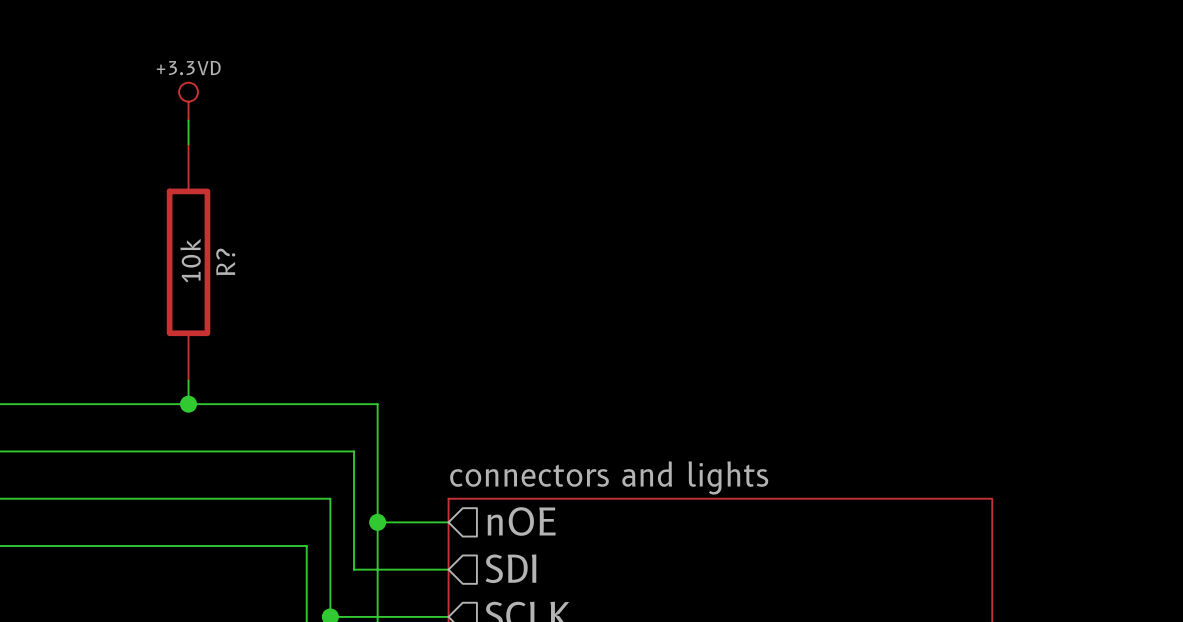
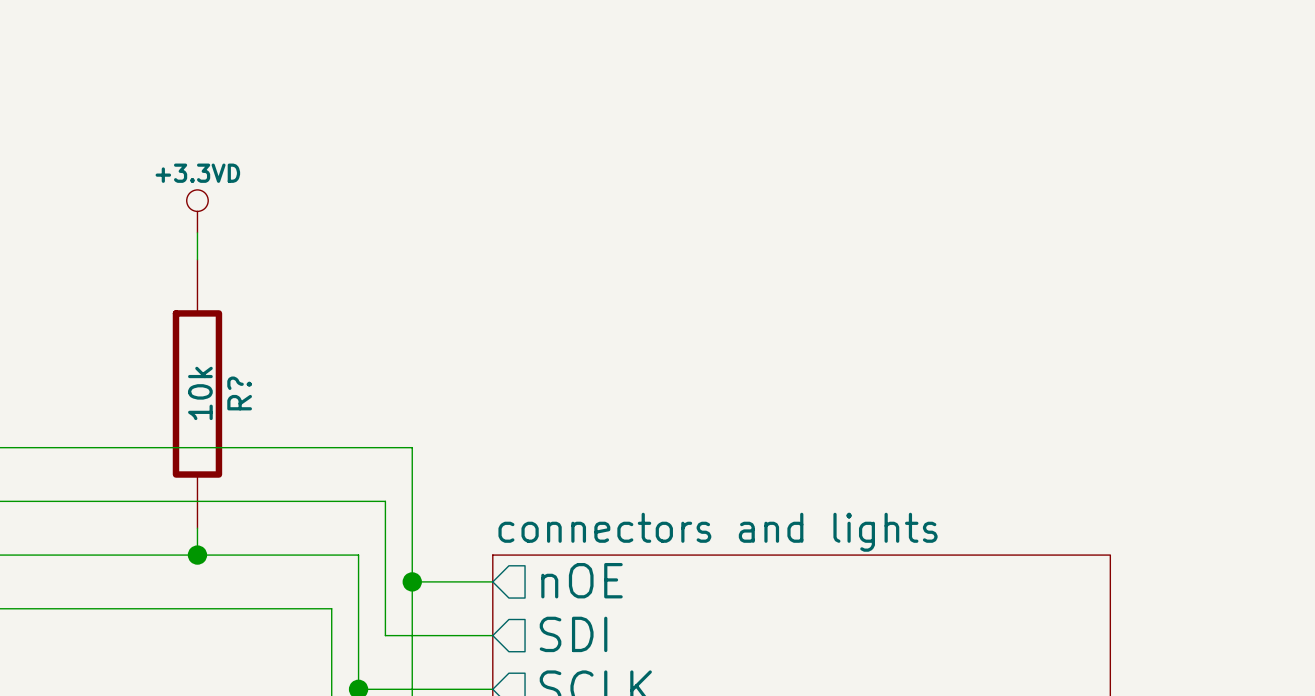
power symbol position: +3.3VD (188, 101) -> +3.3VD (197, 211)
wire: (188, 120) (188, 144) -> (197, 232) (197, 259)
R? position: (188, 262) -> (197, 393)
wire: (188, 380) (188, 404) -> (197, 528) (197, 555)
junction position: (188, 404) -> (197, 555)

